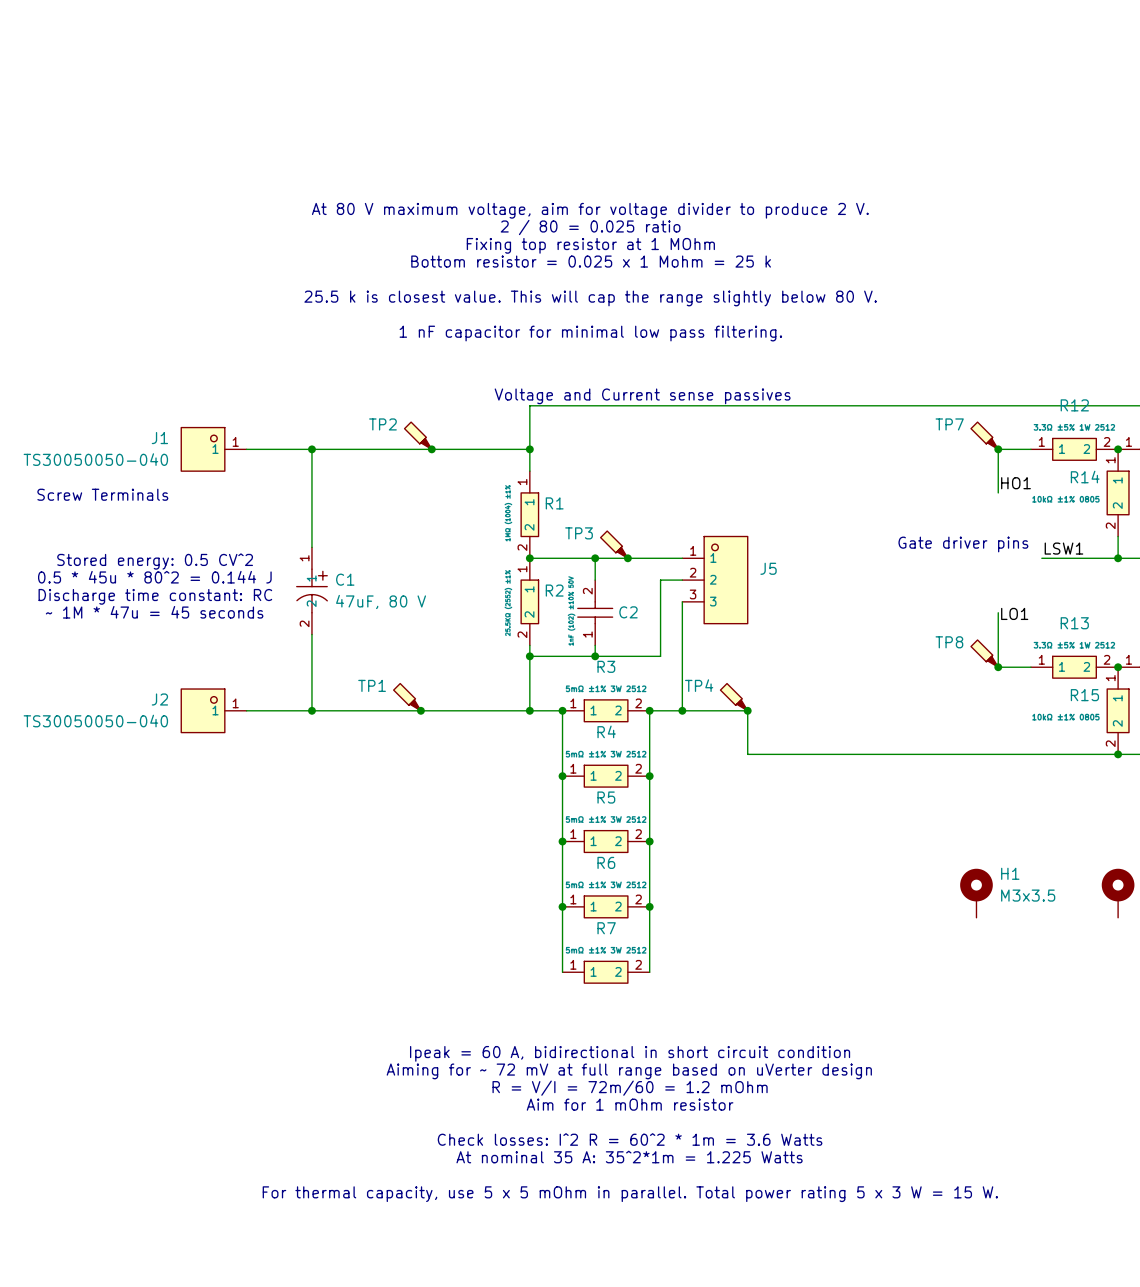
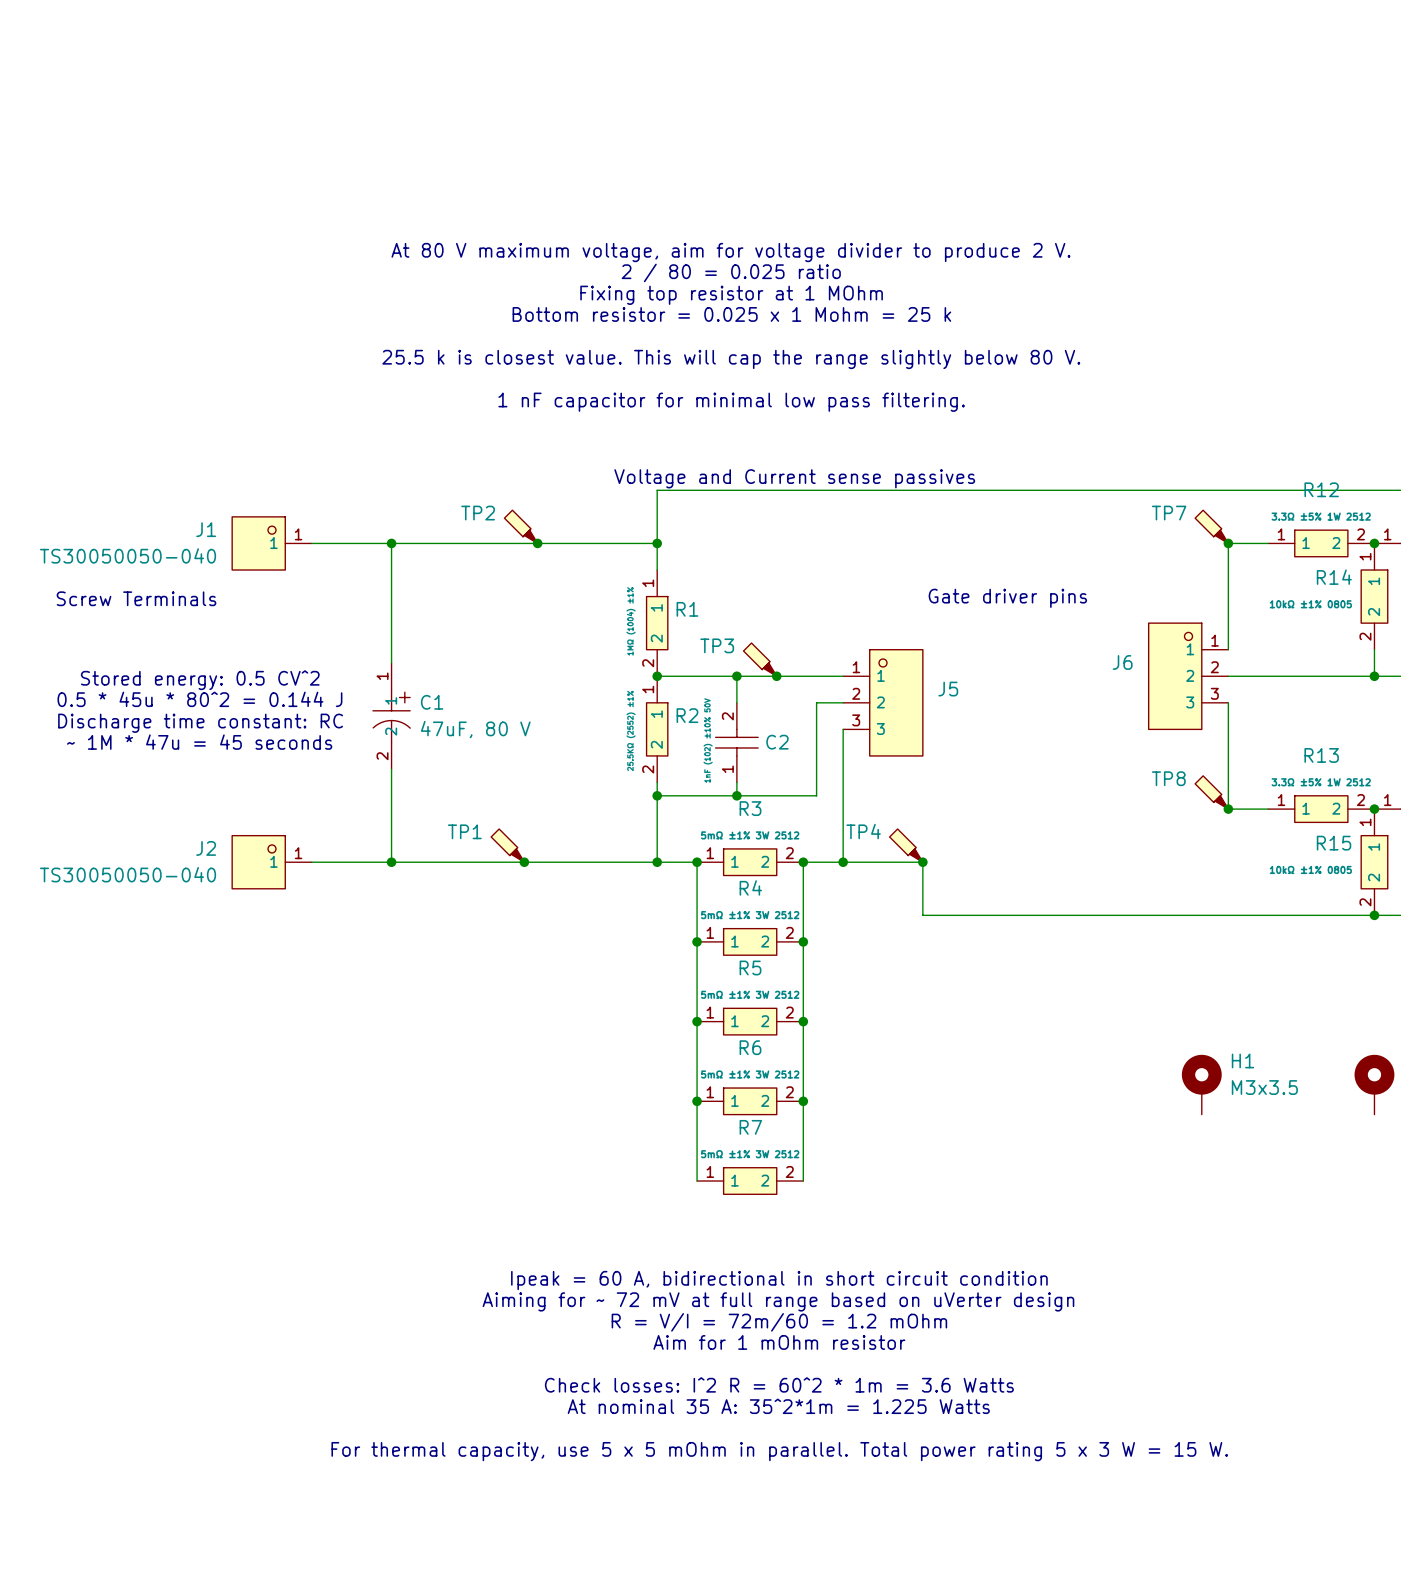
label: HO1 (1015, 483) -> none
wire: none -> (1228, 596) (1228, 649)
text position: Gate driver pins (963, 544) -> Gate driver pins (1007, 598)
label: LSW1 (1063, 548) -> none
J6: none -> (1188, 676)
wire: none -> (1228, 676) (1281, 676)
wire: none -> (1228, 702) (1228, 742)
label: LO1 (1014, 613) -> none

